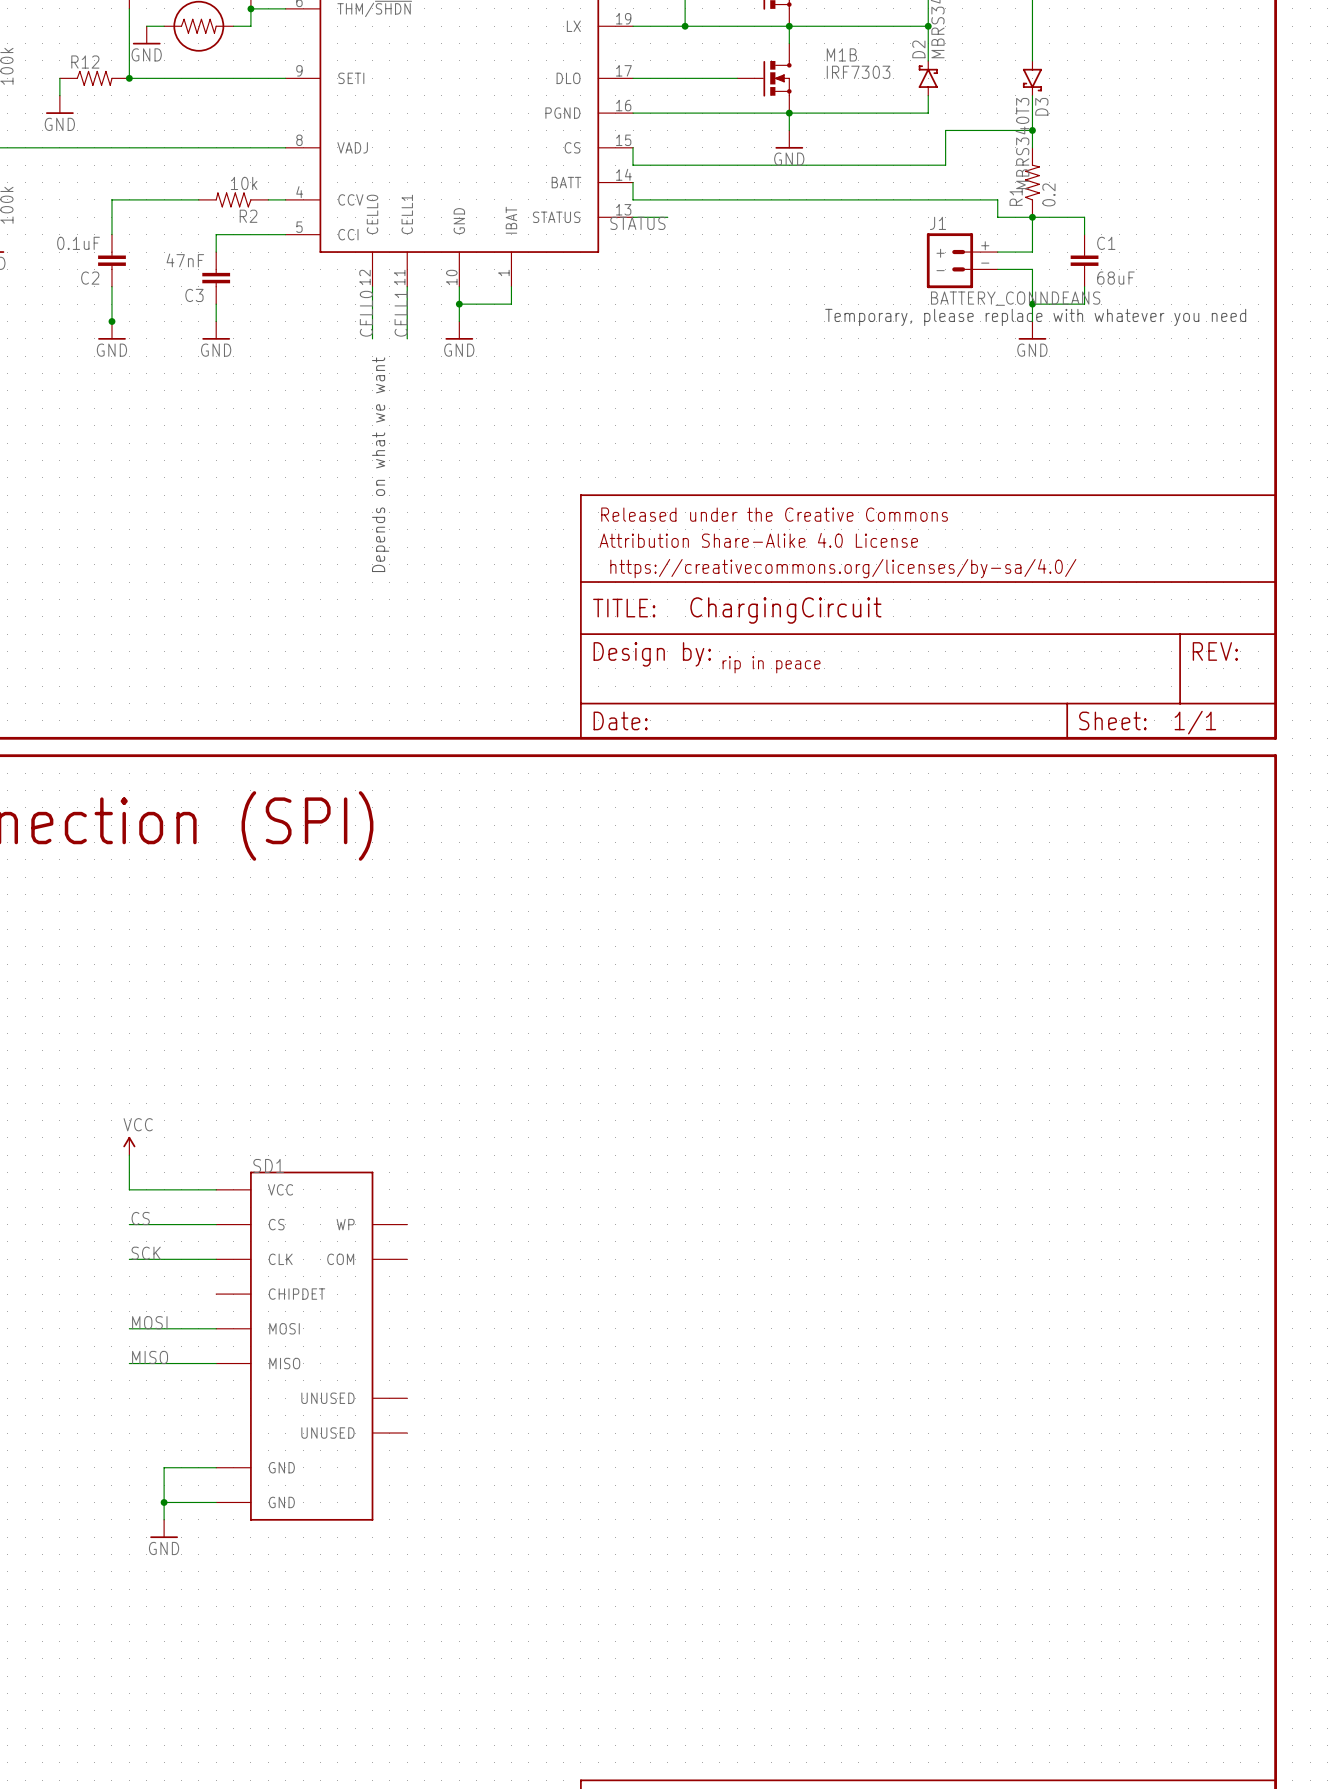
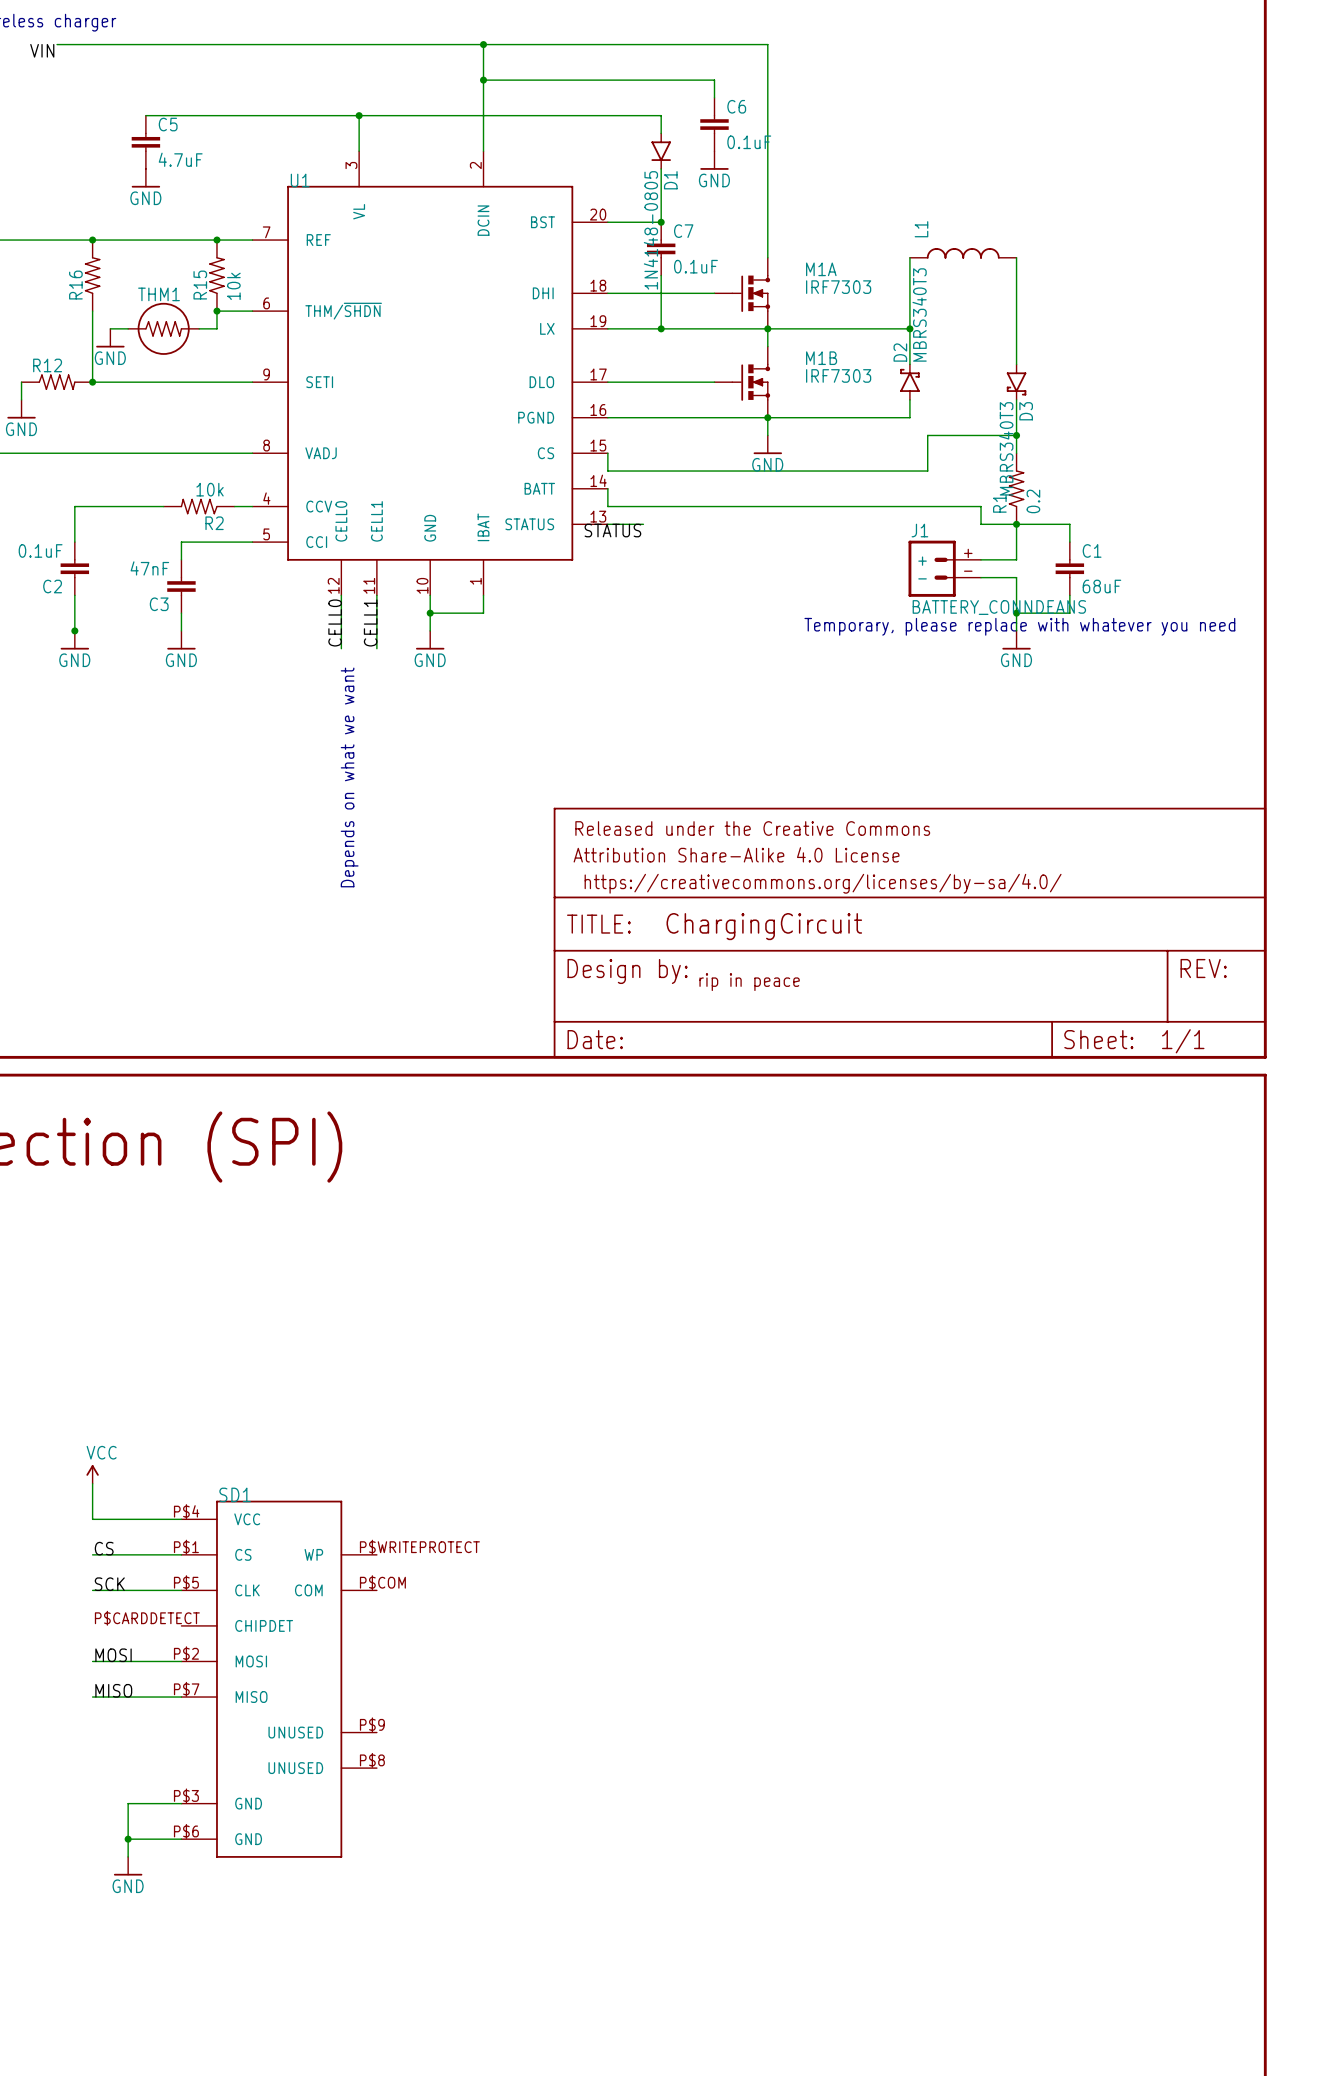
SD1 symbol: [216, 1171, 408, 1521] -> [181, 1500, 377, 1858]

